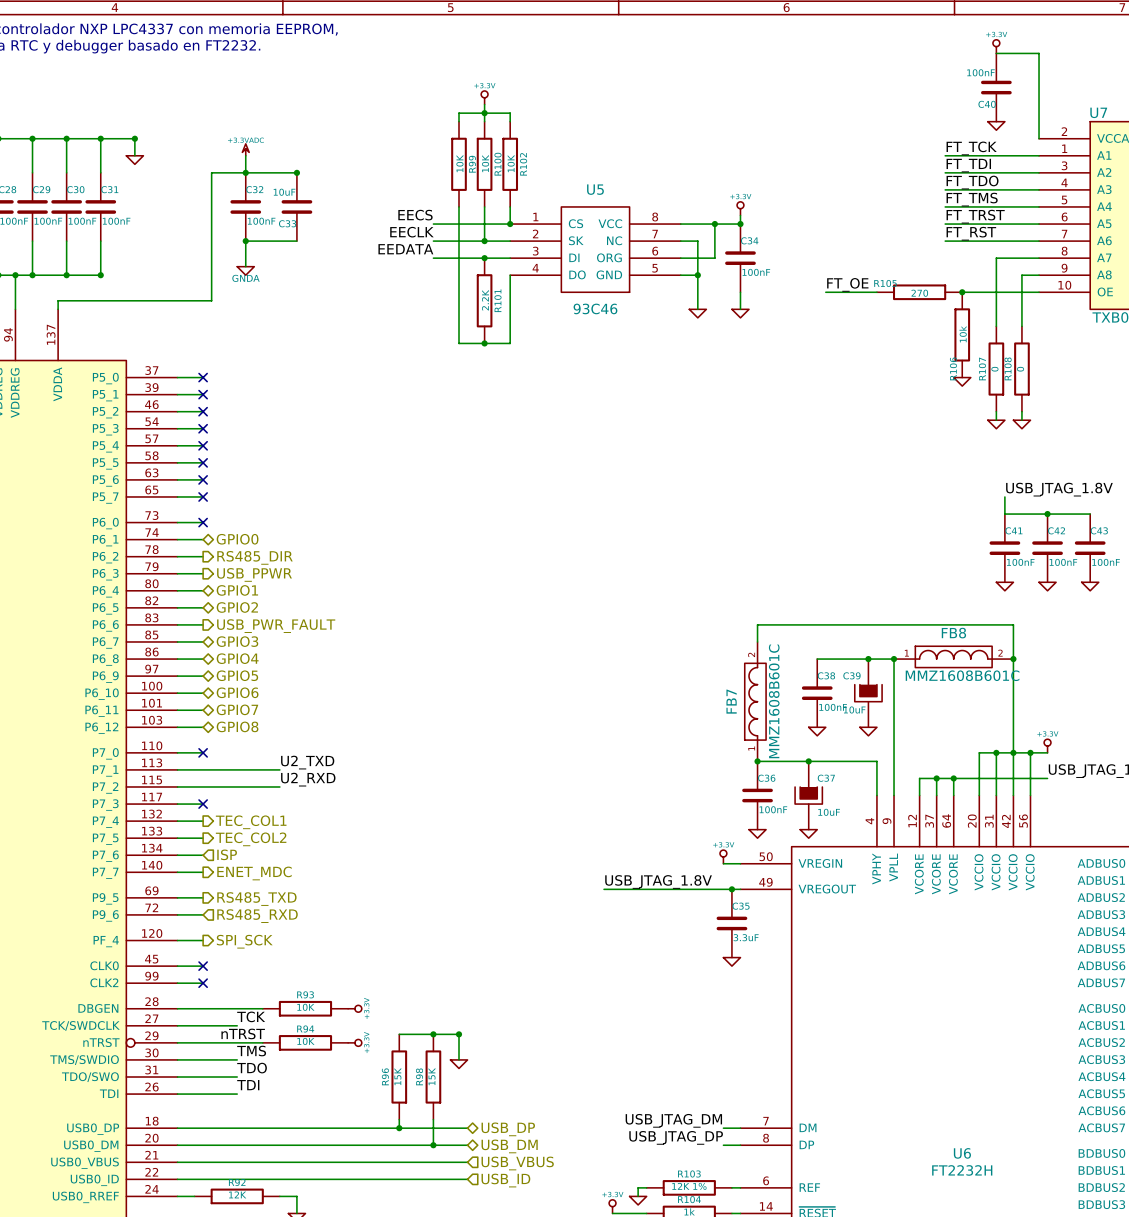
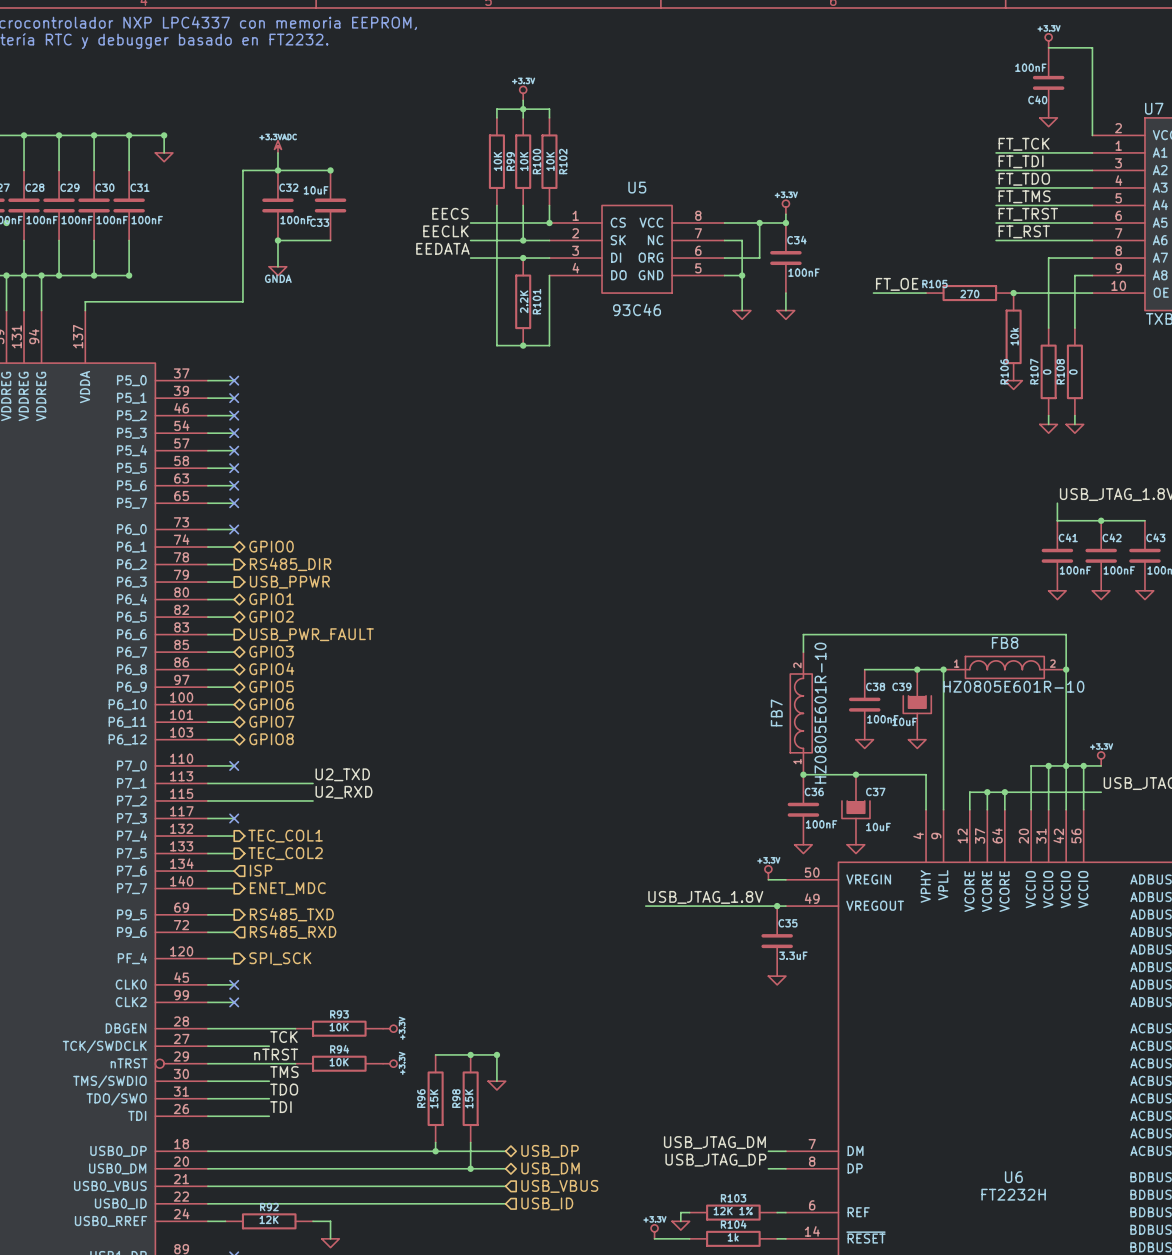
FB8 value: MMZ1608B601C (962, 675) -> HZ0805E601R-10 (1013, 686)
FB7 value: MMZ1608B601C (774, 701) -> HZ0805E601R-10 (820, 713)

